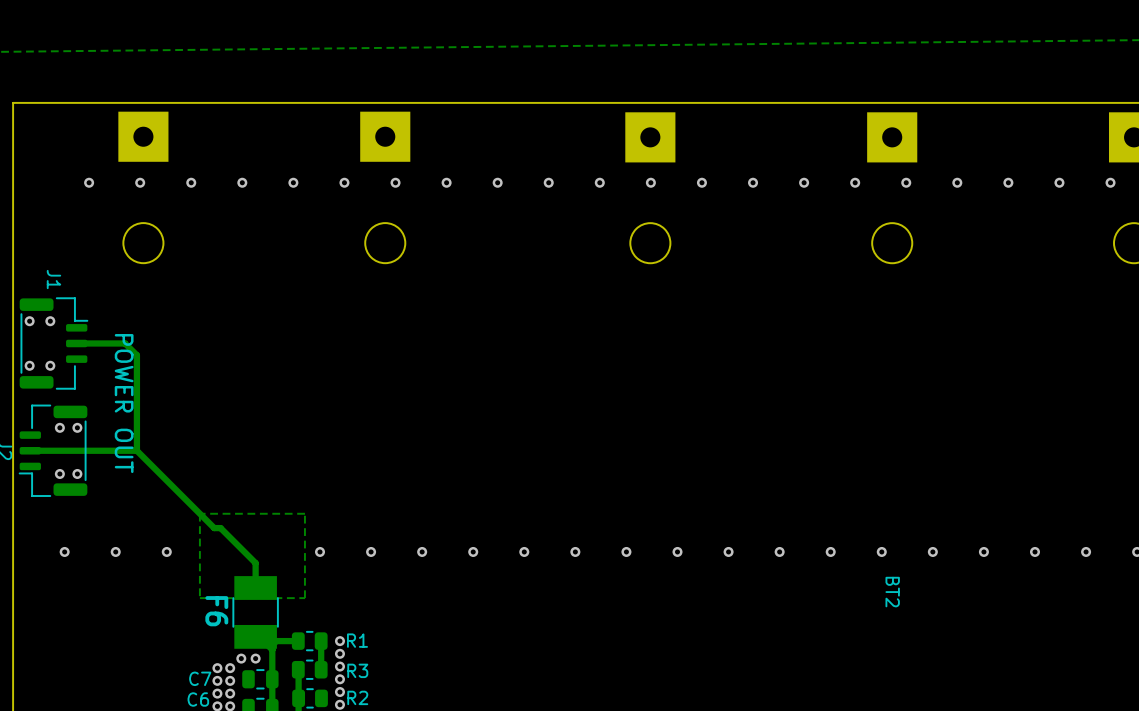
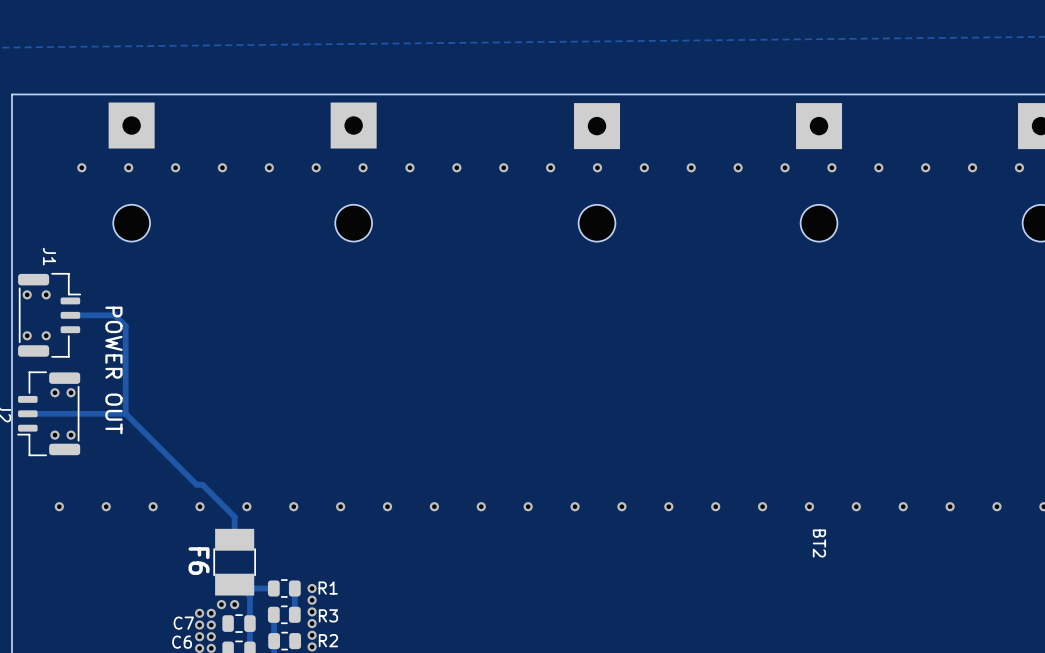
zone outline: (304, 513) (304, 598) (199, 598) (199, 513) (304, 513) -> none
via: none -> (199, 506)
via: none -> (246, 506)

